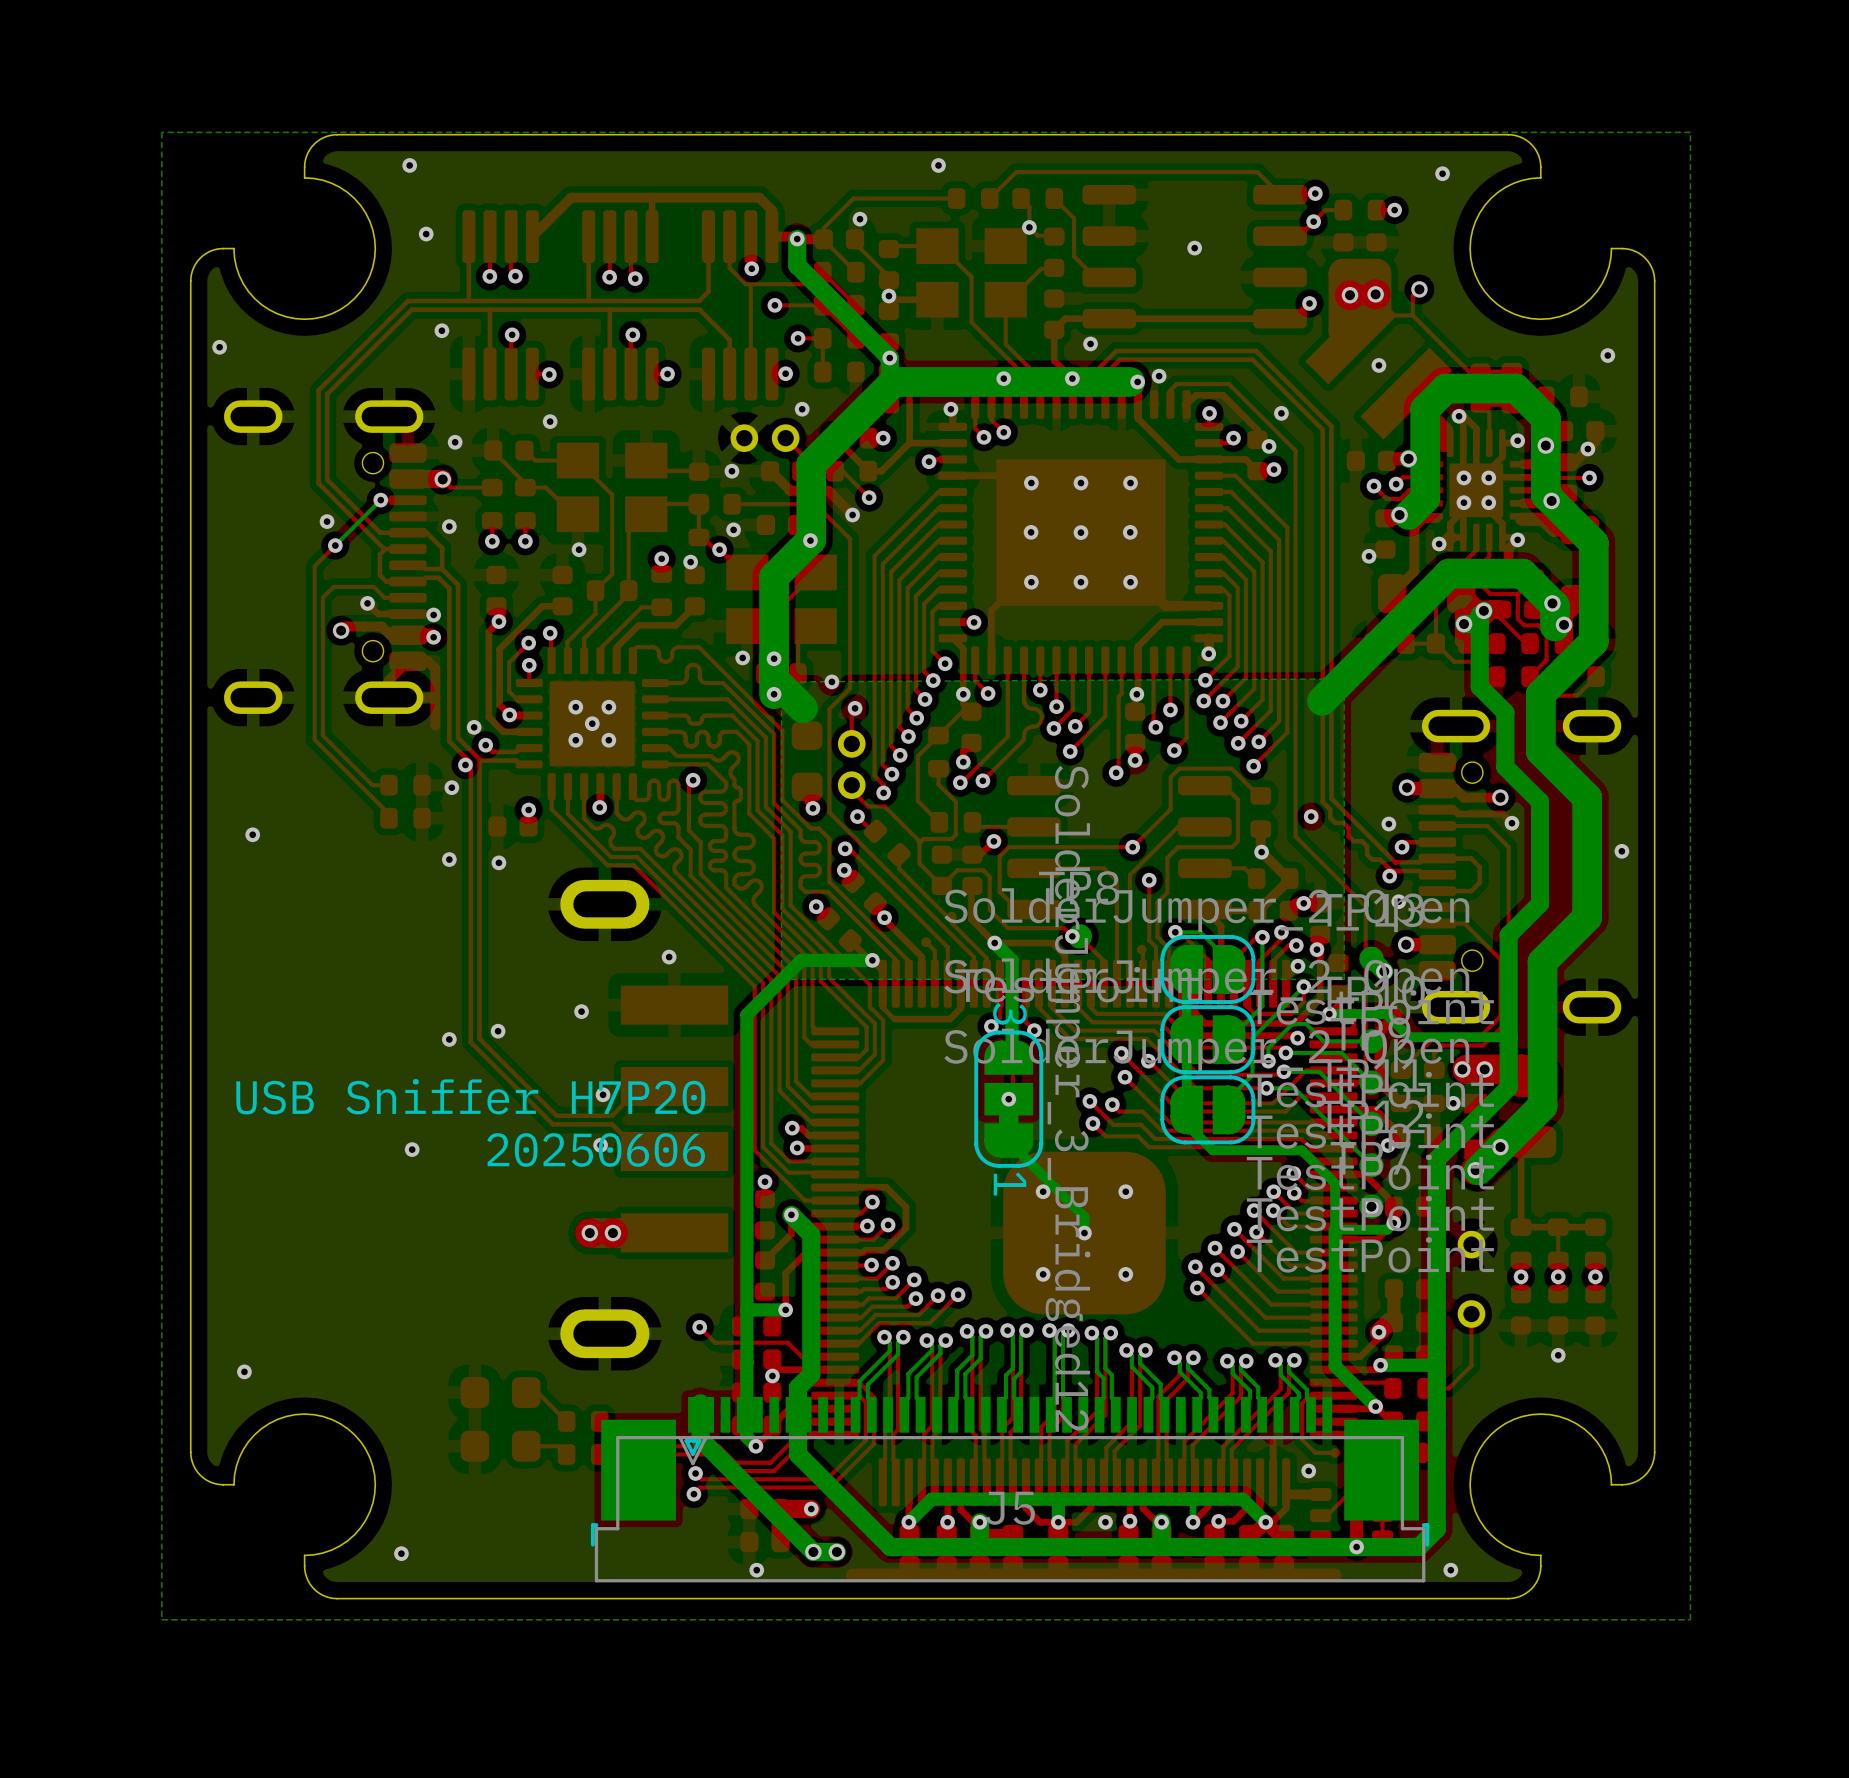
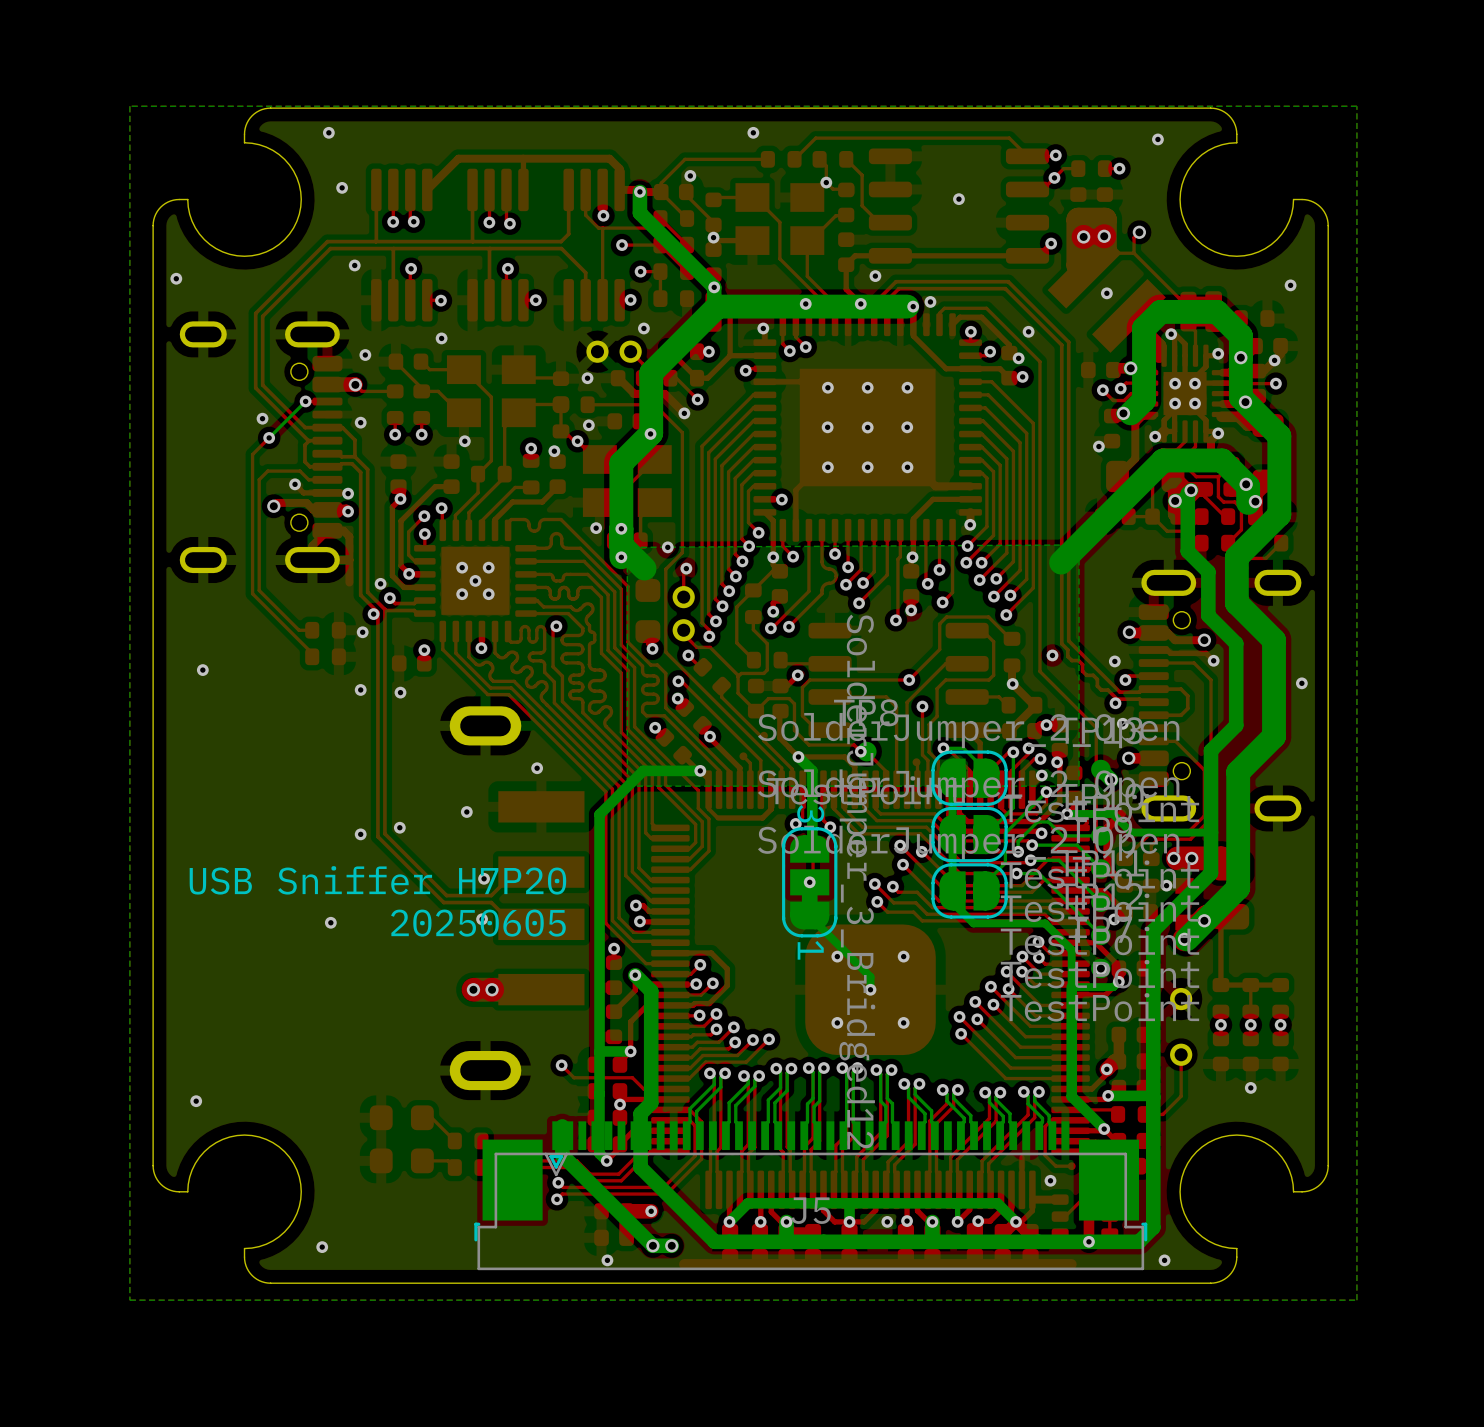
text: 20250606 (596, 1150) -> 20250605 (478, 923)

